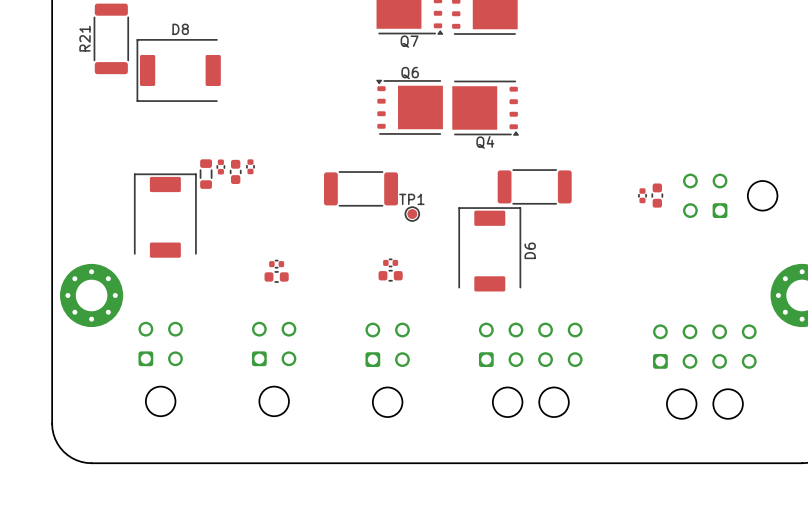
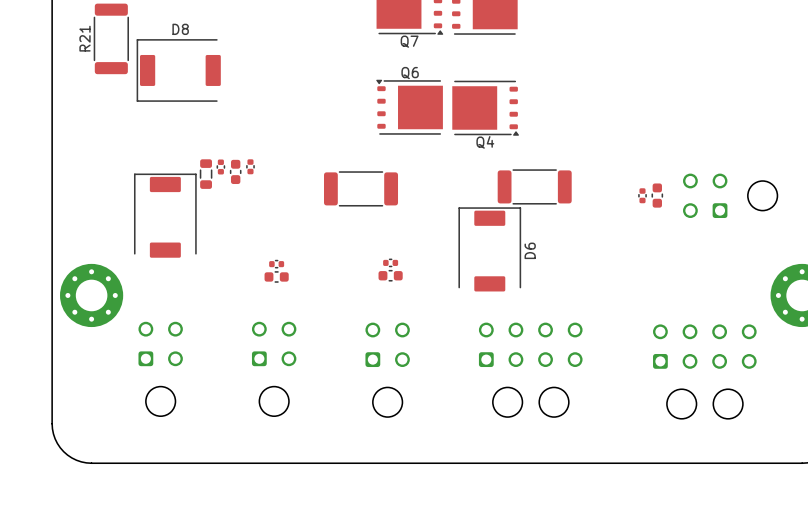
TP1: (412, 214) -> none

